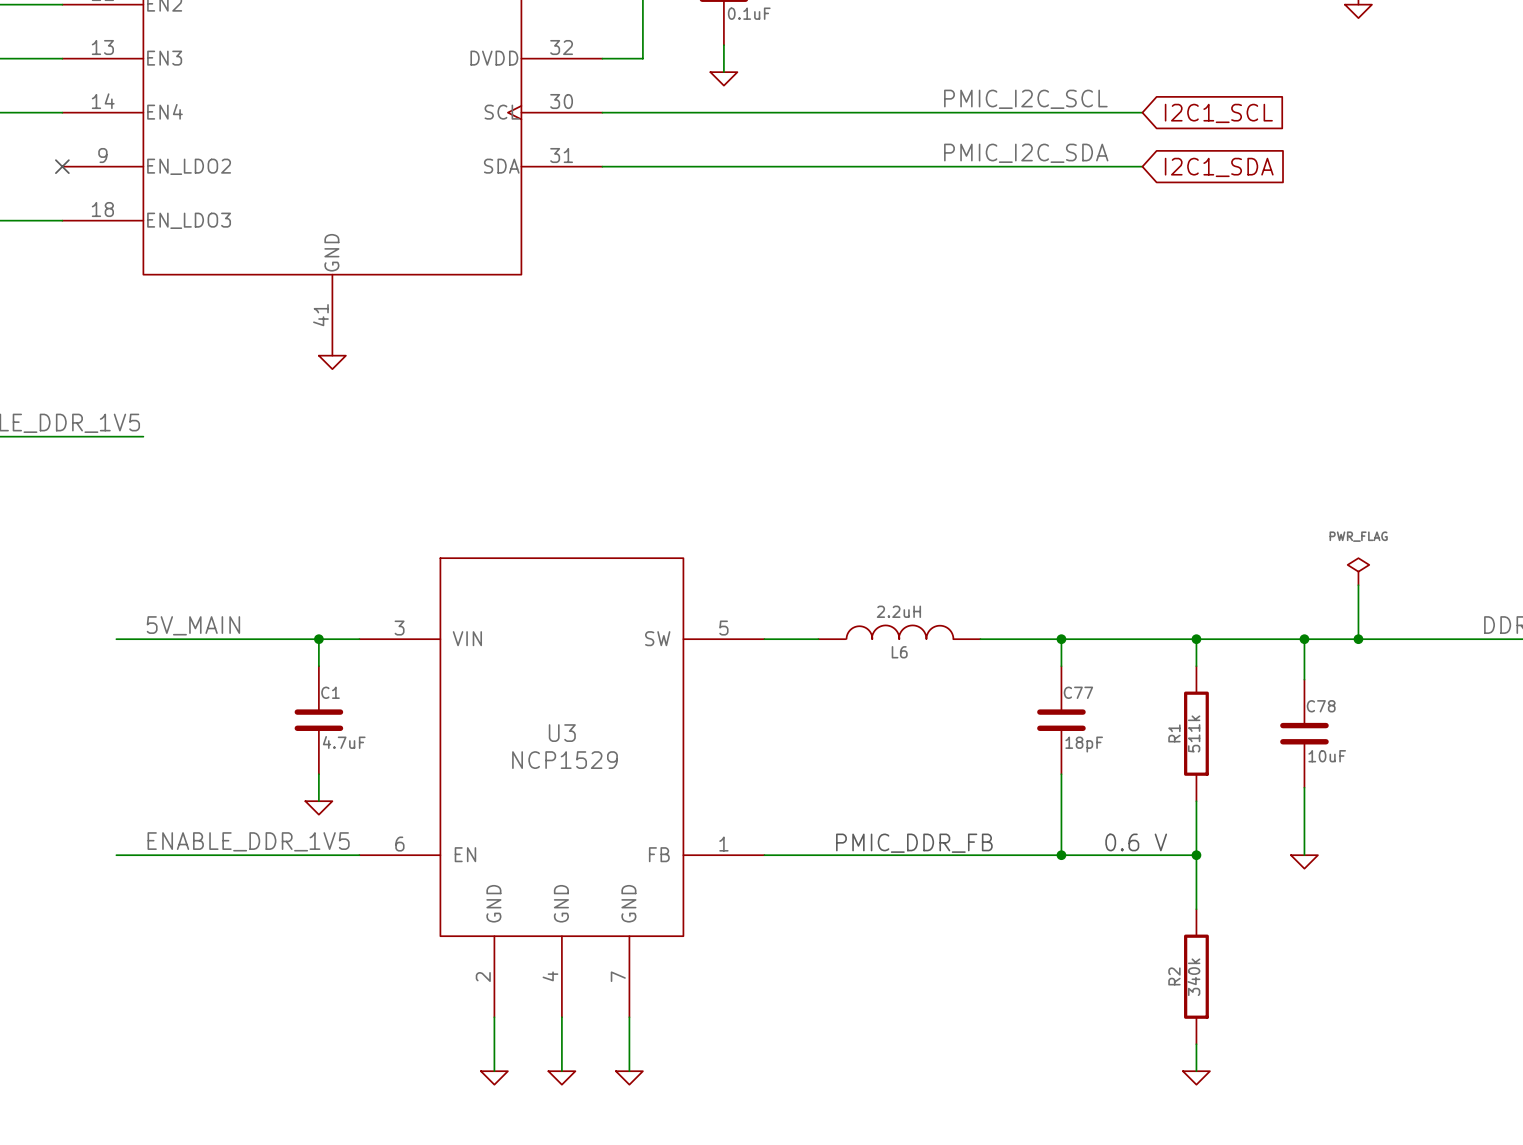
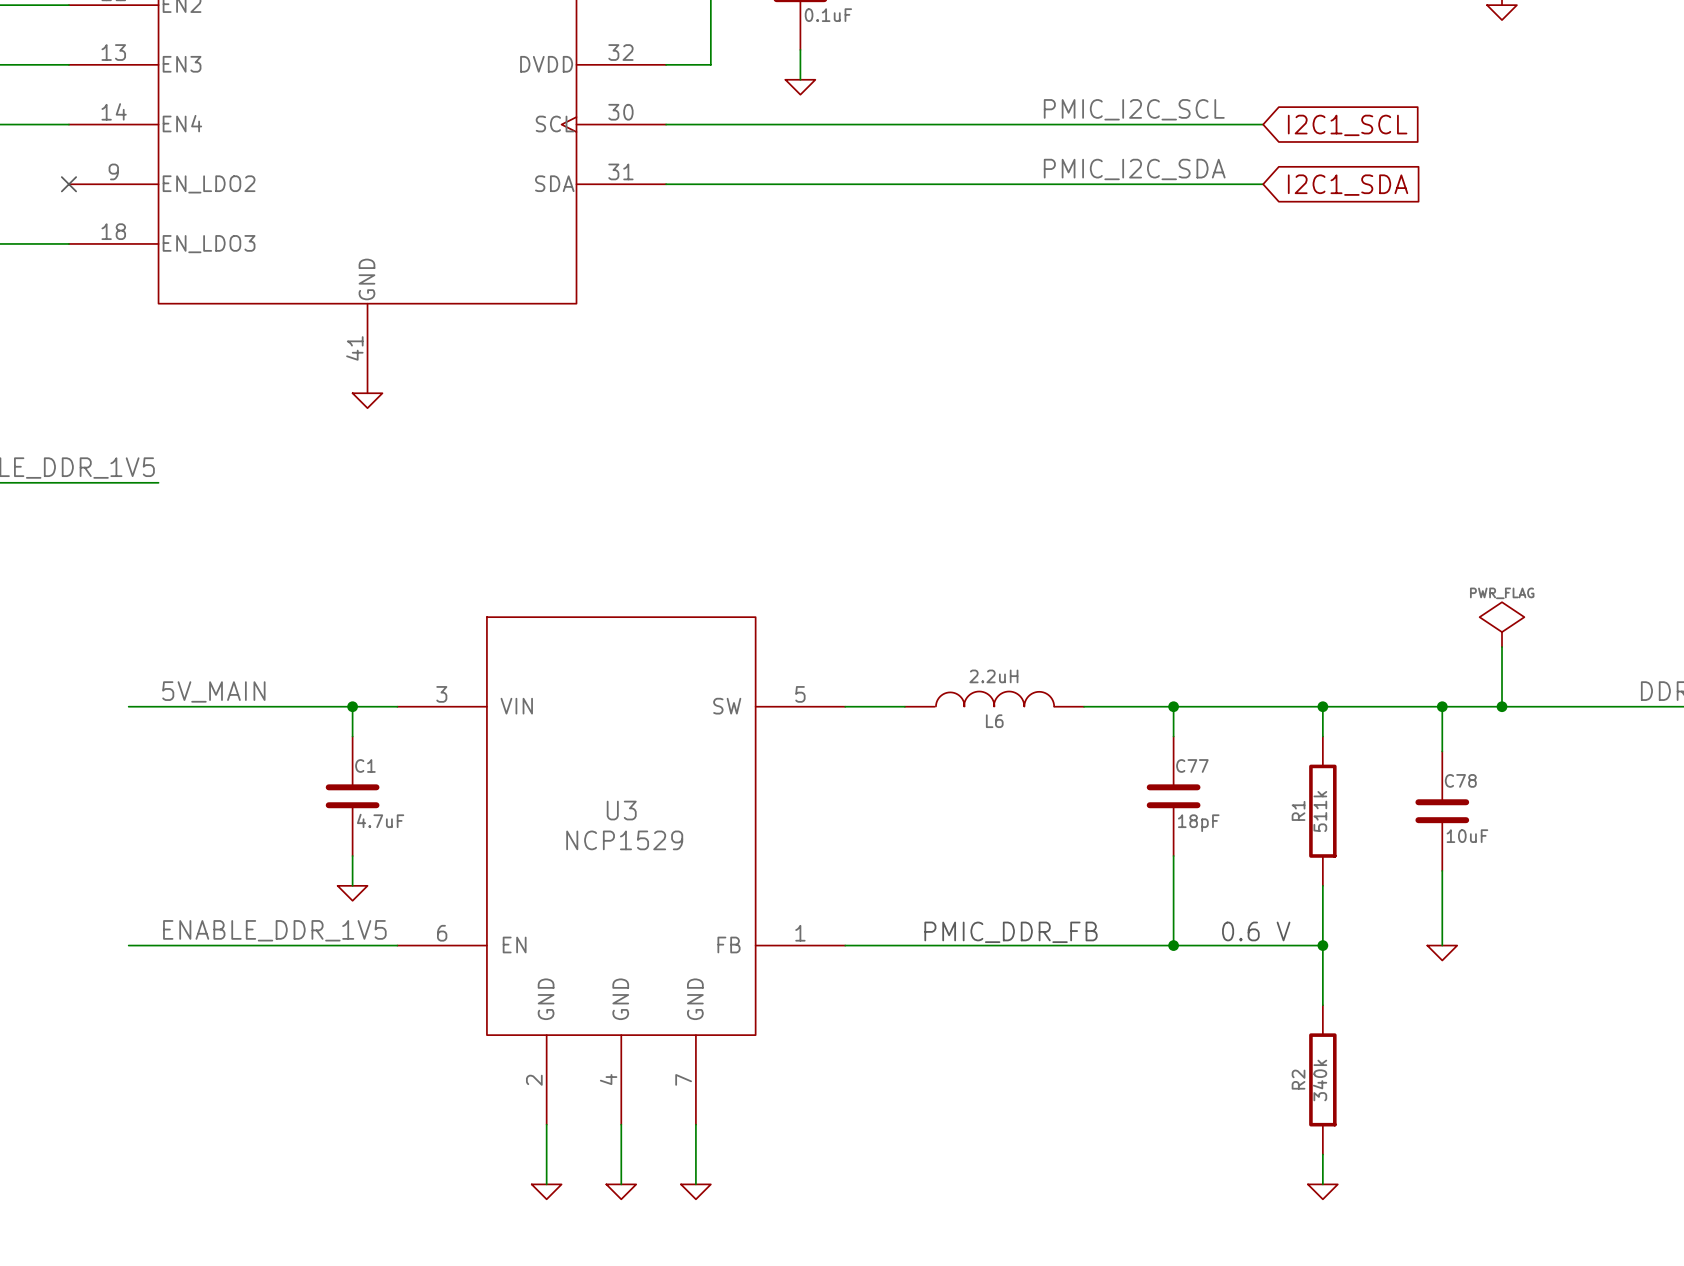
power symbol shape: [1347, 558, 1370, 586] -> [1479, 602, 1525, 648]

